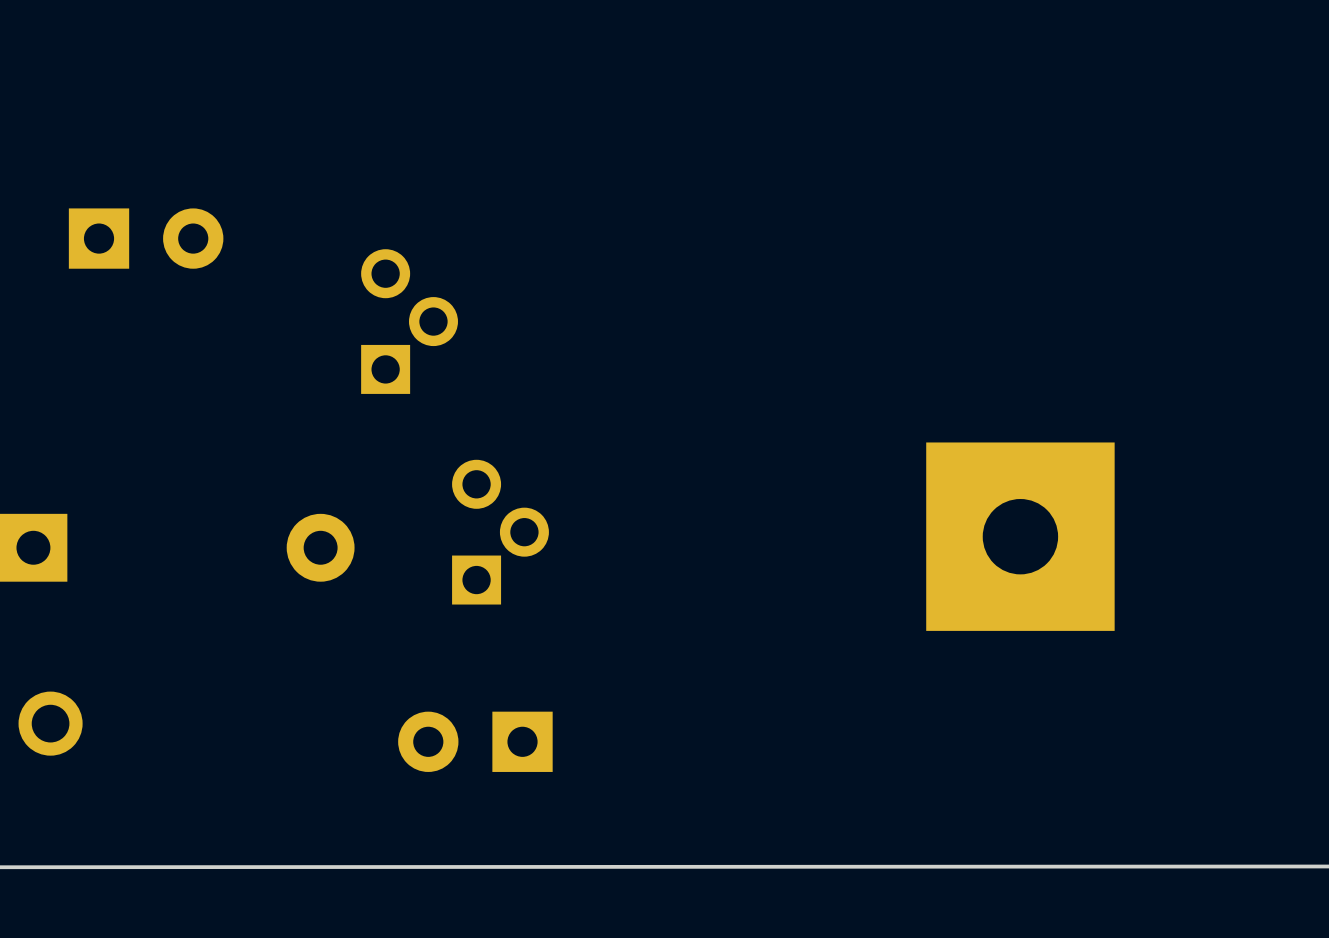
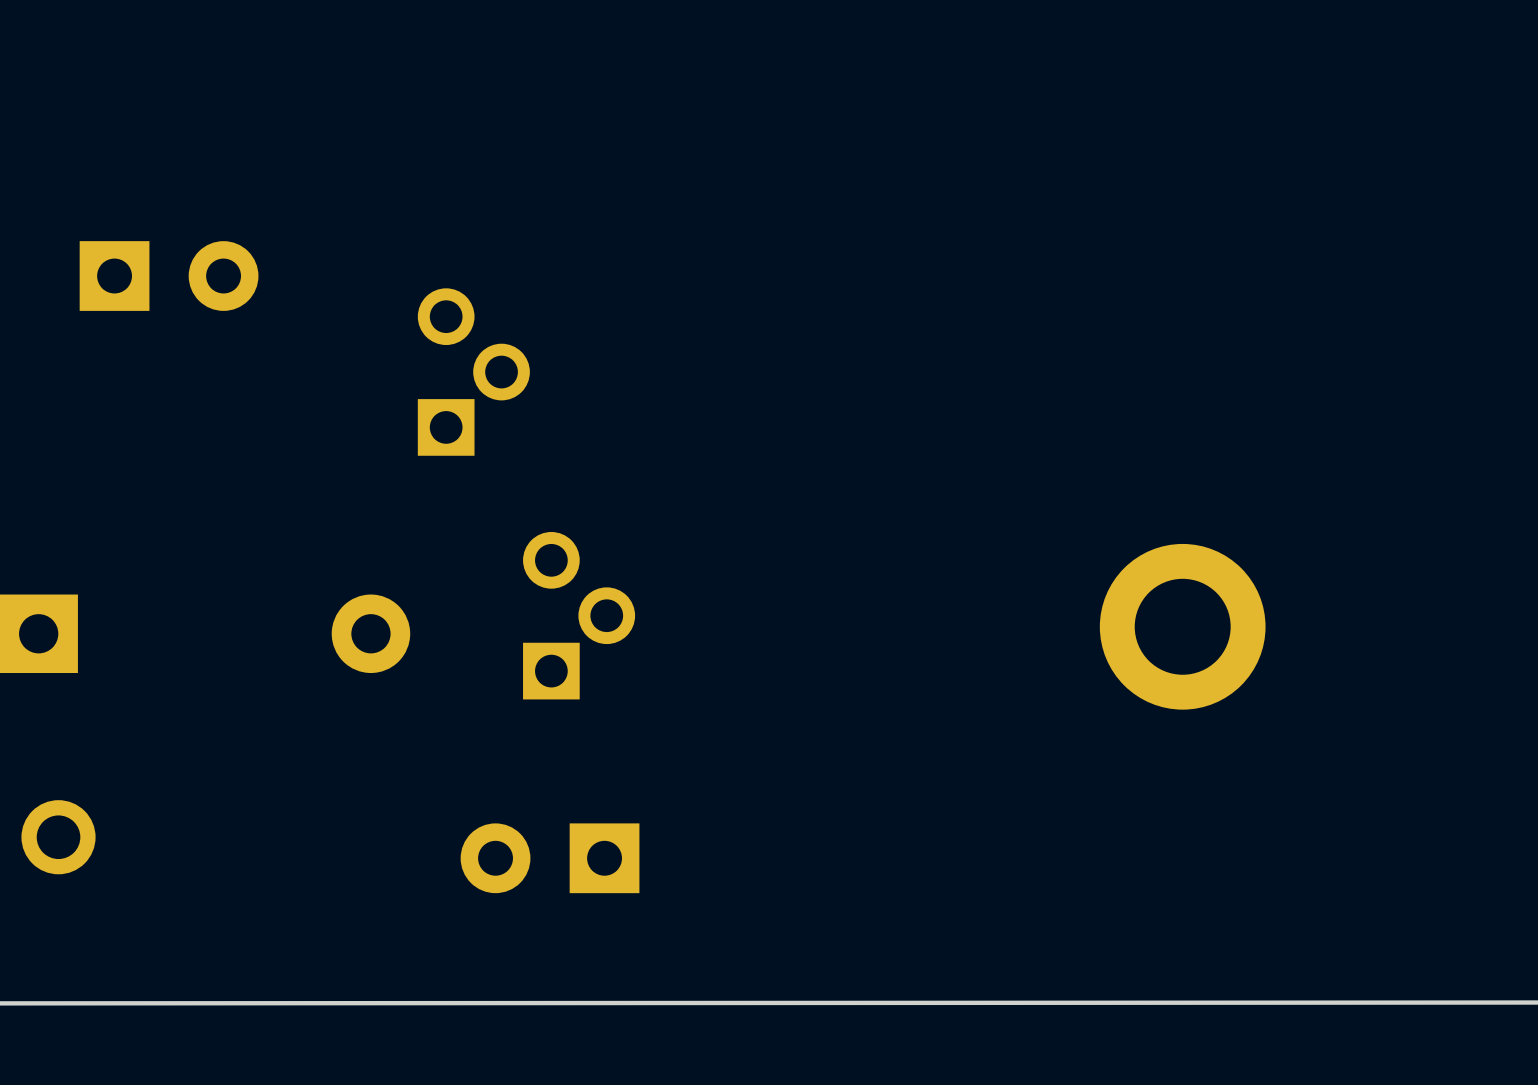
part footprint: [926, 442, 1115, 631] -> [1099, 543, 1266, 710]

